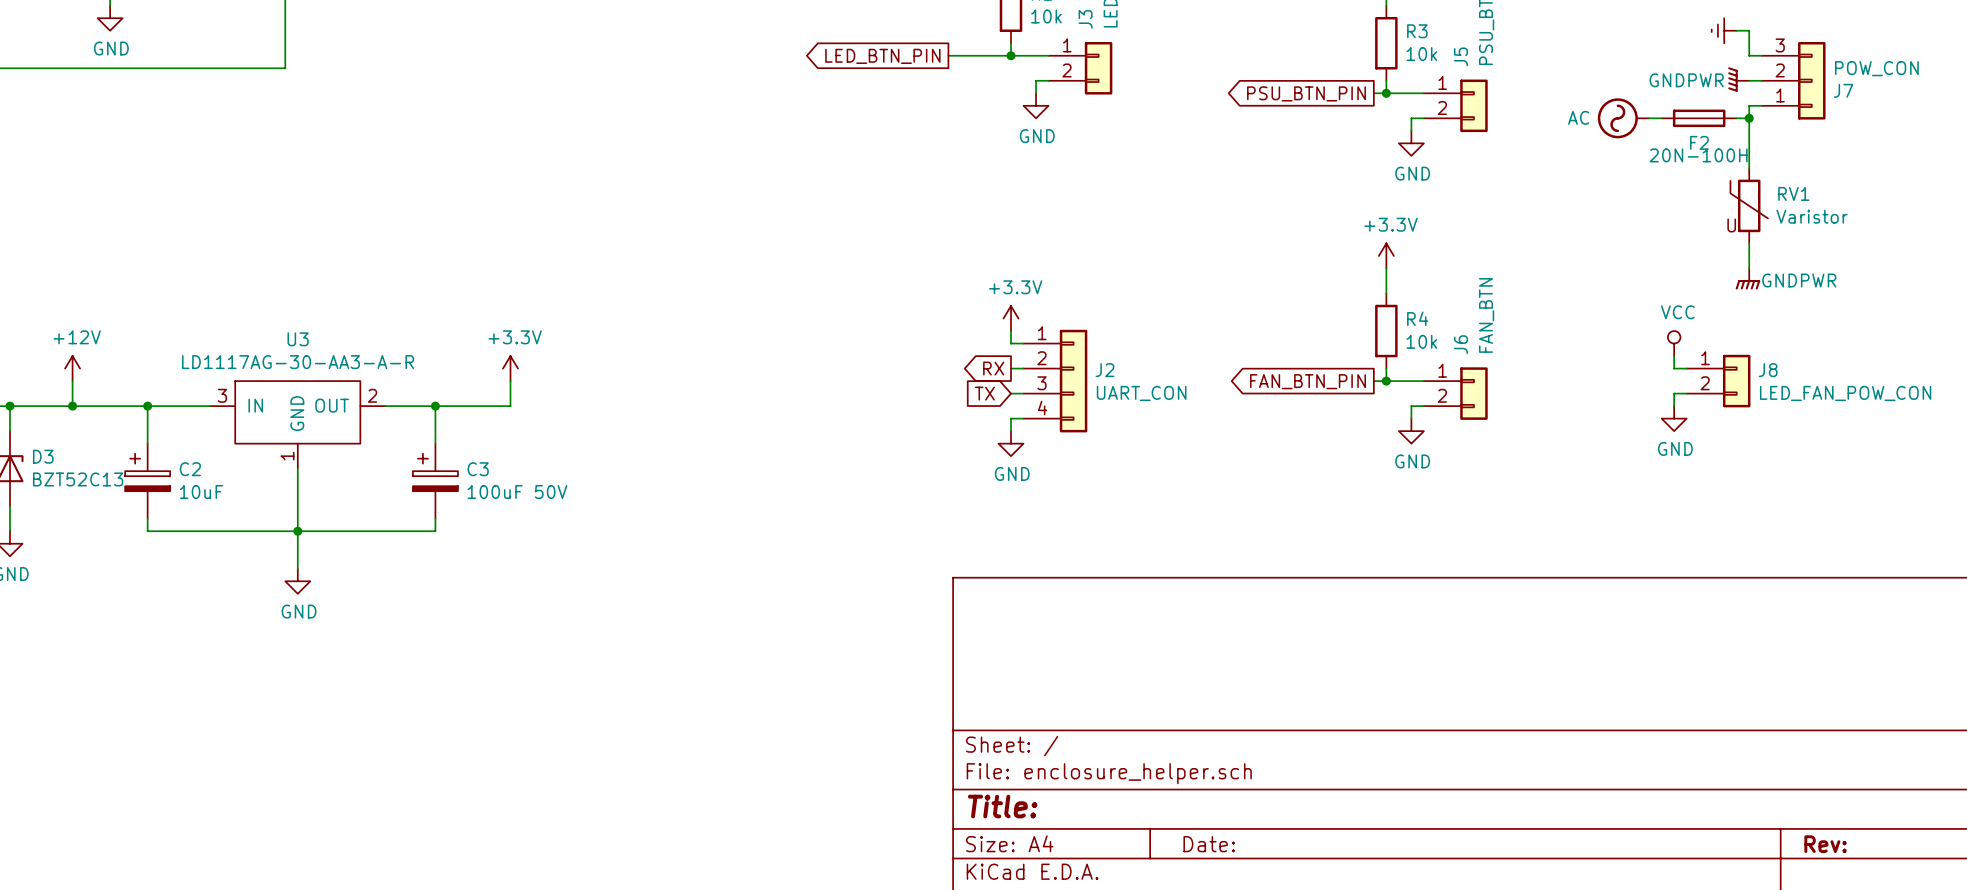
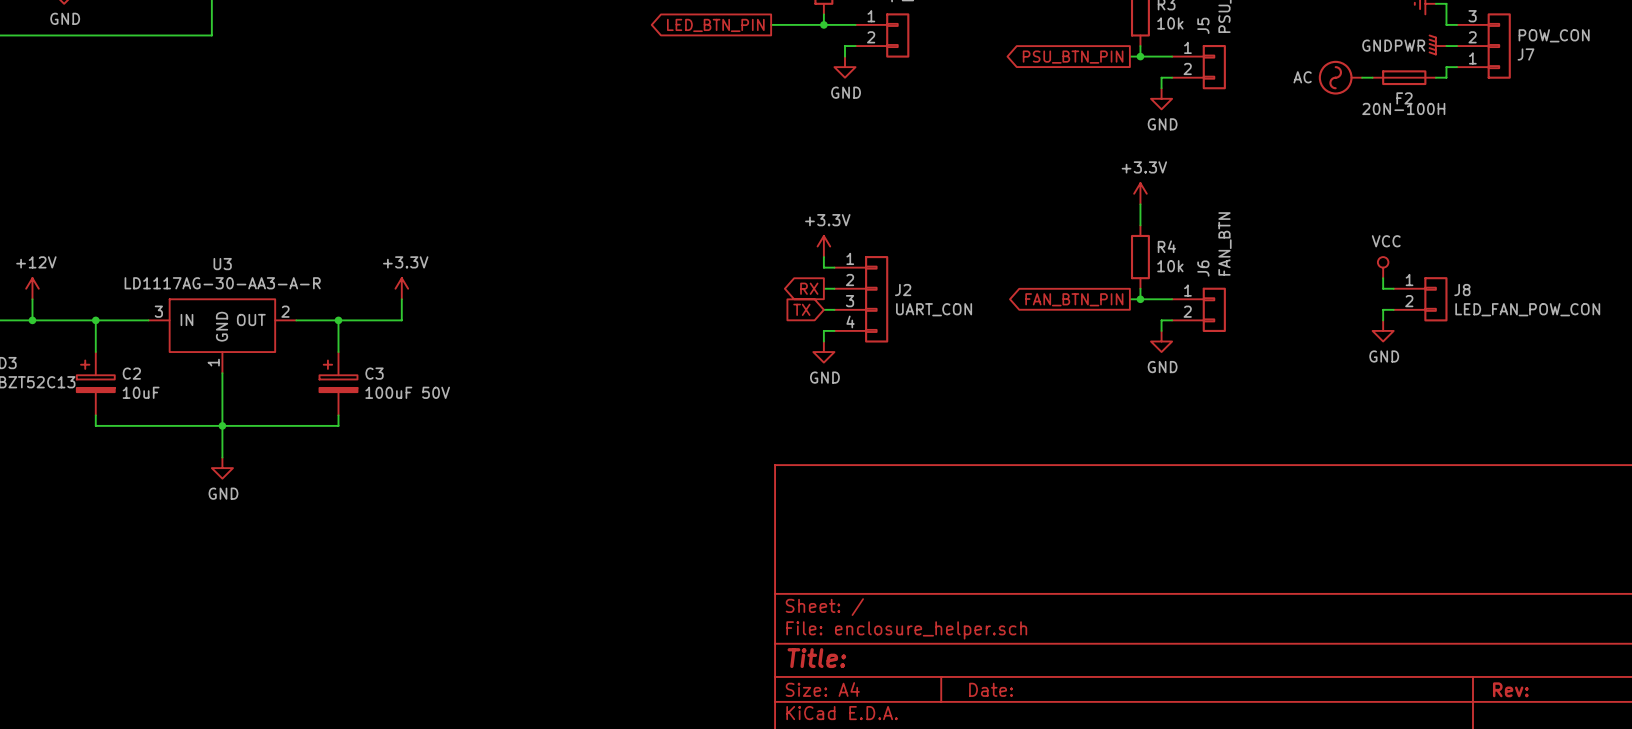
wire: (1749, 118) (1749, 168) -> none
junction: (1749, 118) -> none
RV1: Varistor (1749, 205) -> none
wire: (1749, 243) (1749, 268) -> none
power symbol: GNDPWR (1747, 278) -> none

